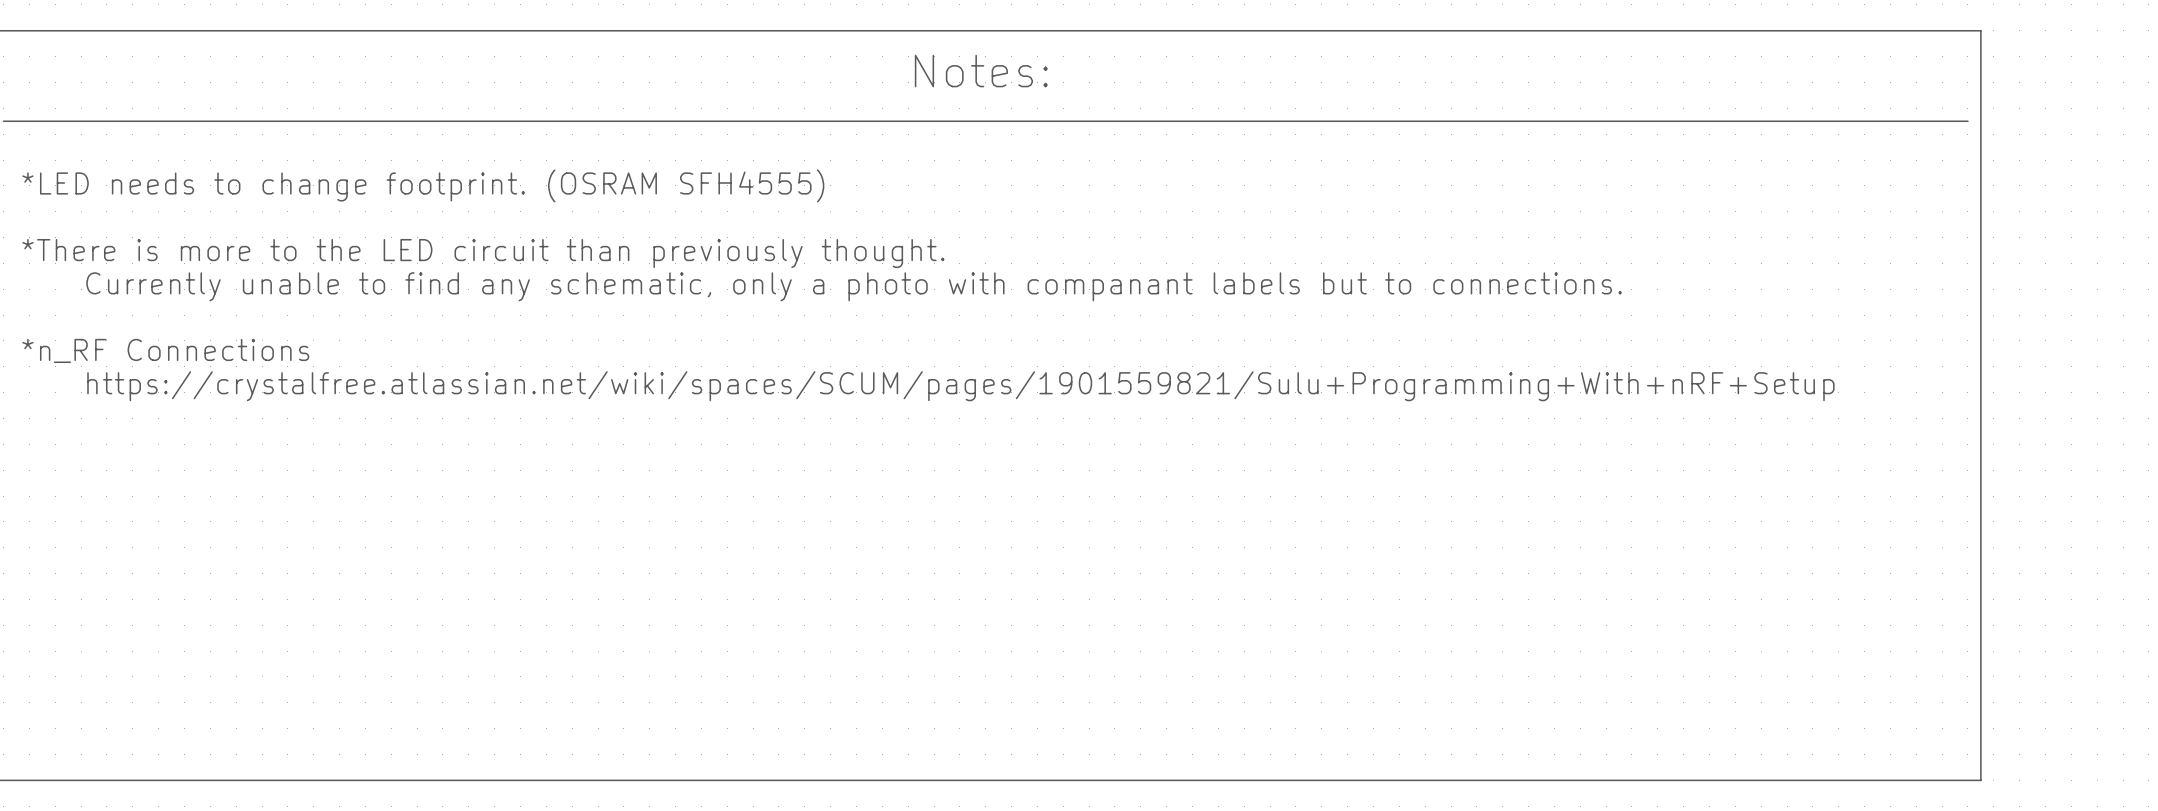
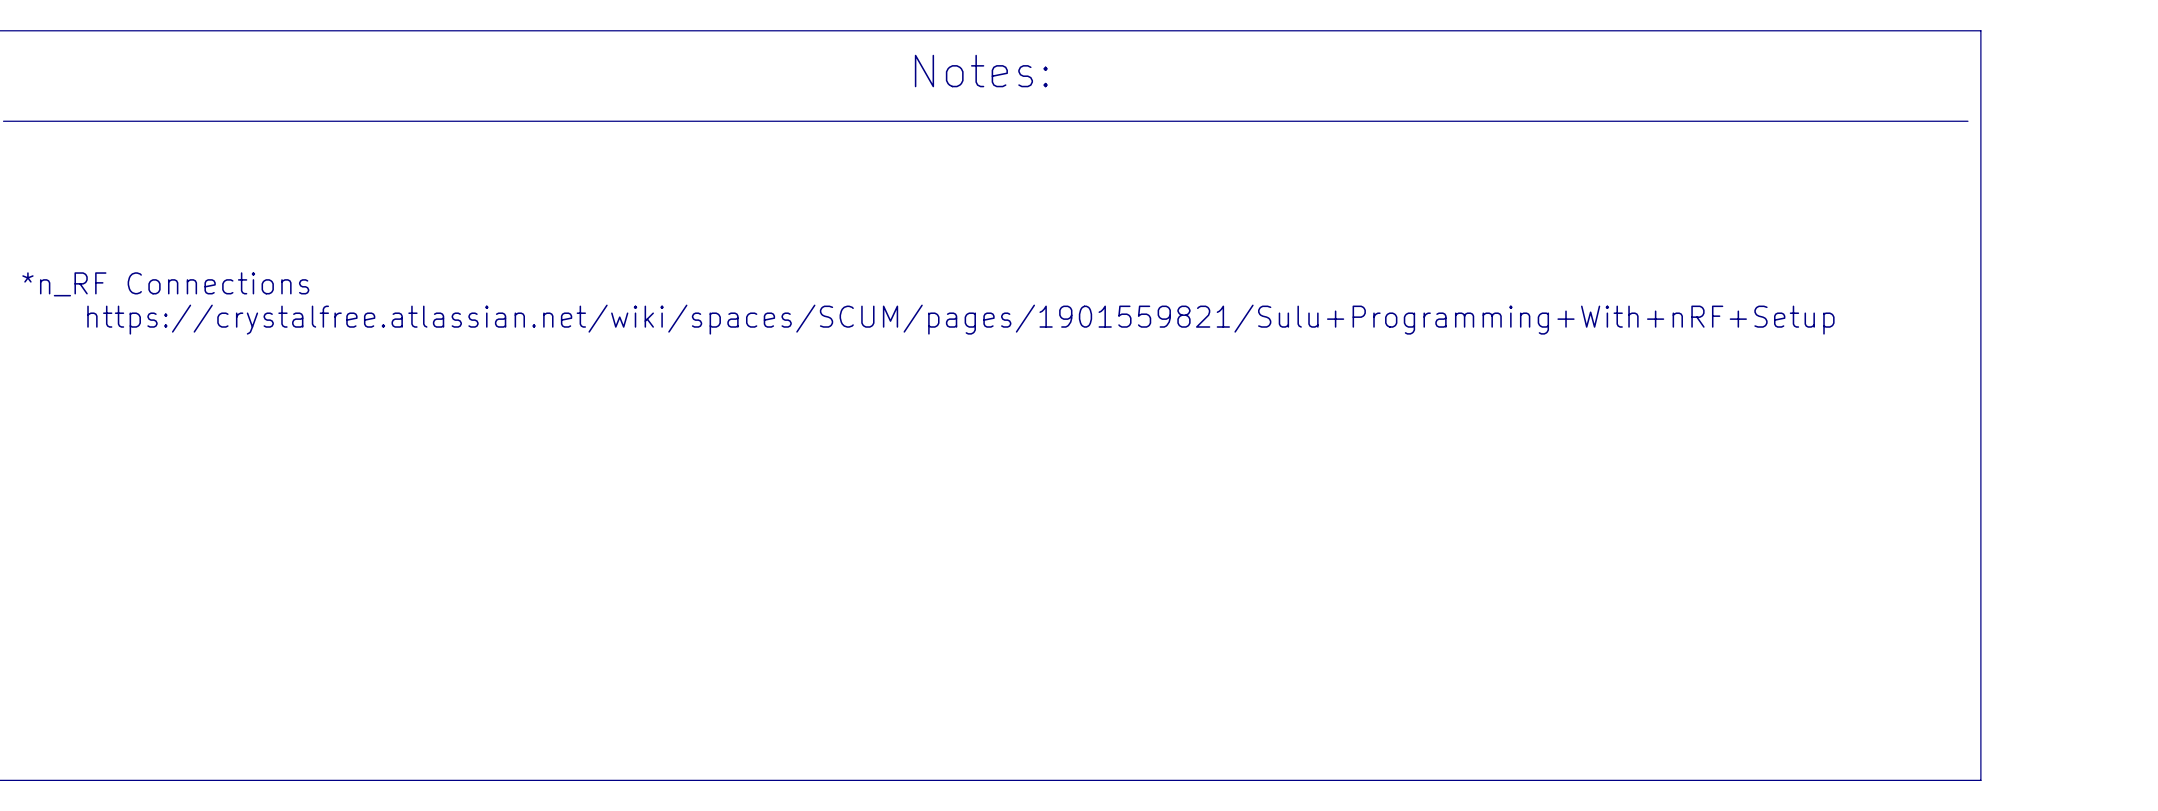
text: *LED needs to change footprint. (OSRAM SFH4555) (423, 185) -> none
text: *There is more to the LED circuit than previously thought. (483, 253) -> none
text: Currently unable to find any schematic, only a photo with companant labels but to connections. (854, 286) -> *n_RF Connections (165, 284)
text: *n_RF Connections (165, 350) -> none
text position: https://crystalfree.atlassian.net/wiki/spaces/SCUM/pages/1901559821/Sulu+Programming+With+nRF+Setup (960, 386) -> https://crystalfree.atlassian.net/wiki/spaces/SCUM/pages/1901559821/Sulu+Programming+With+nRF+Setup (960, 319)

